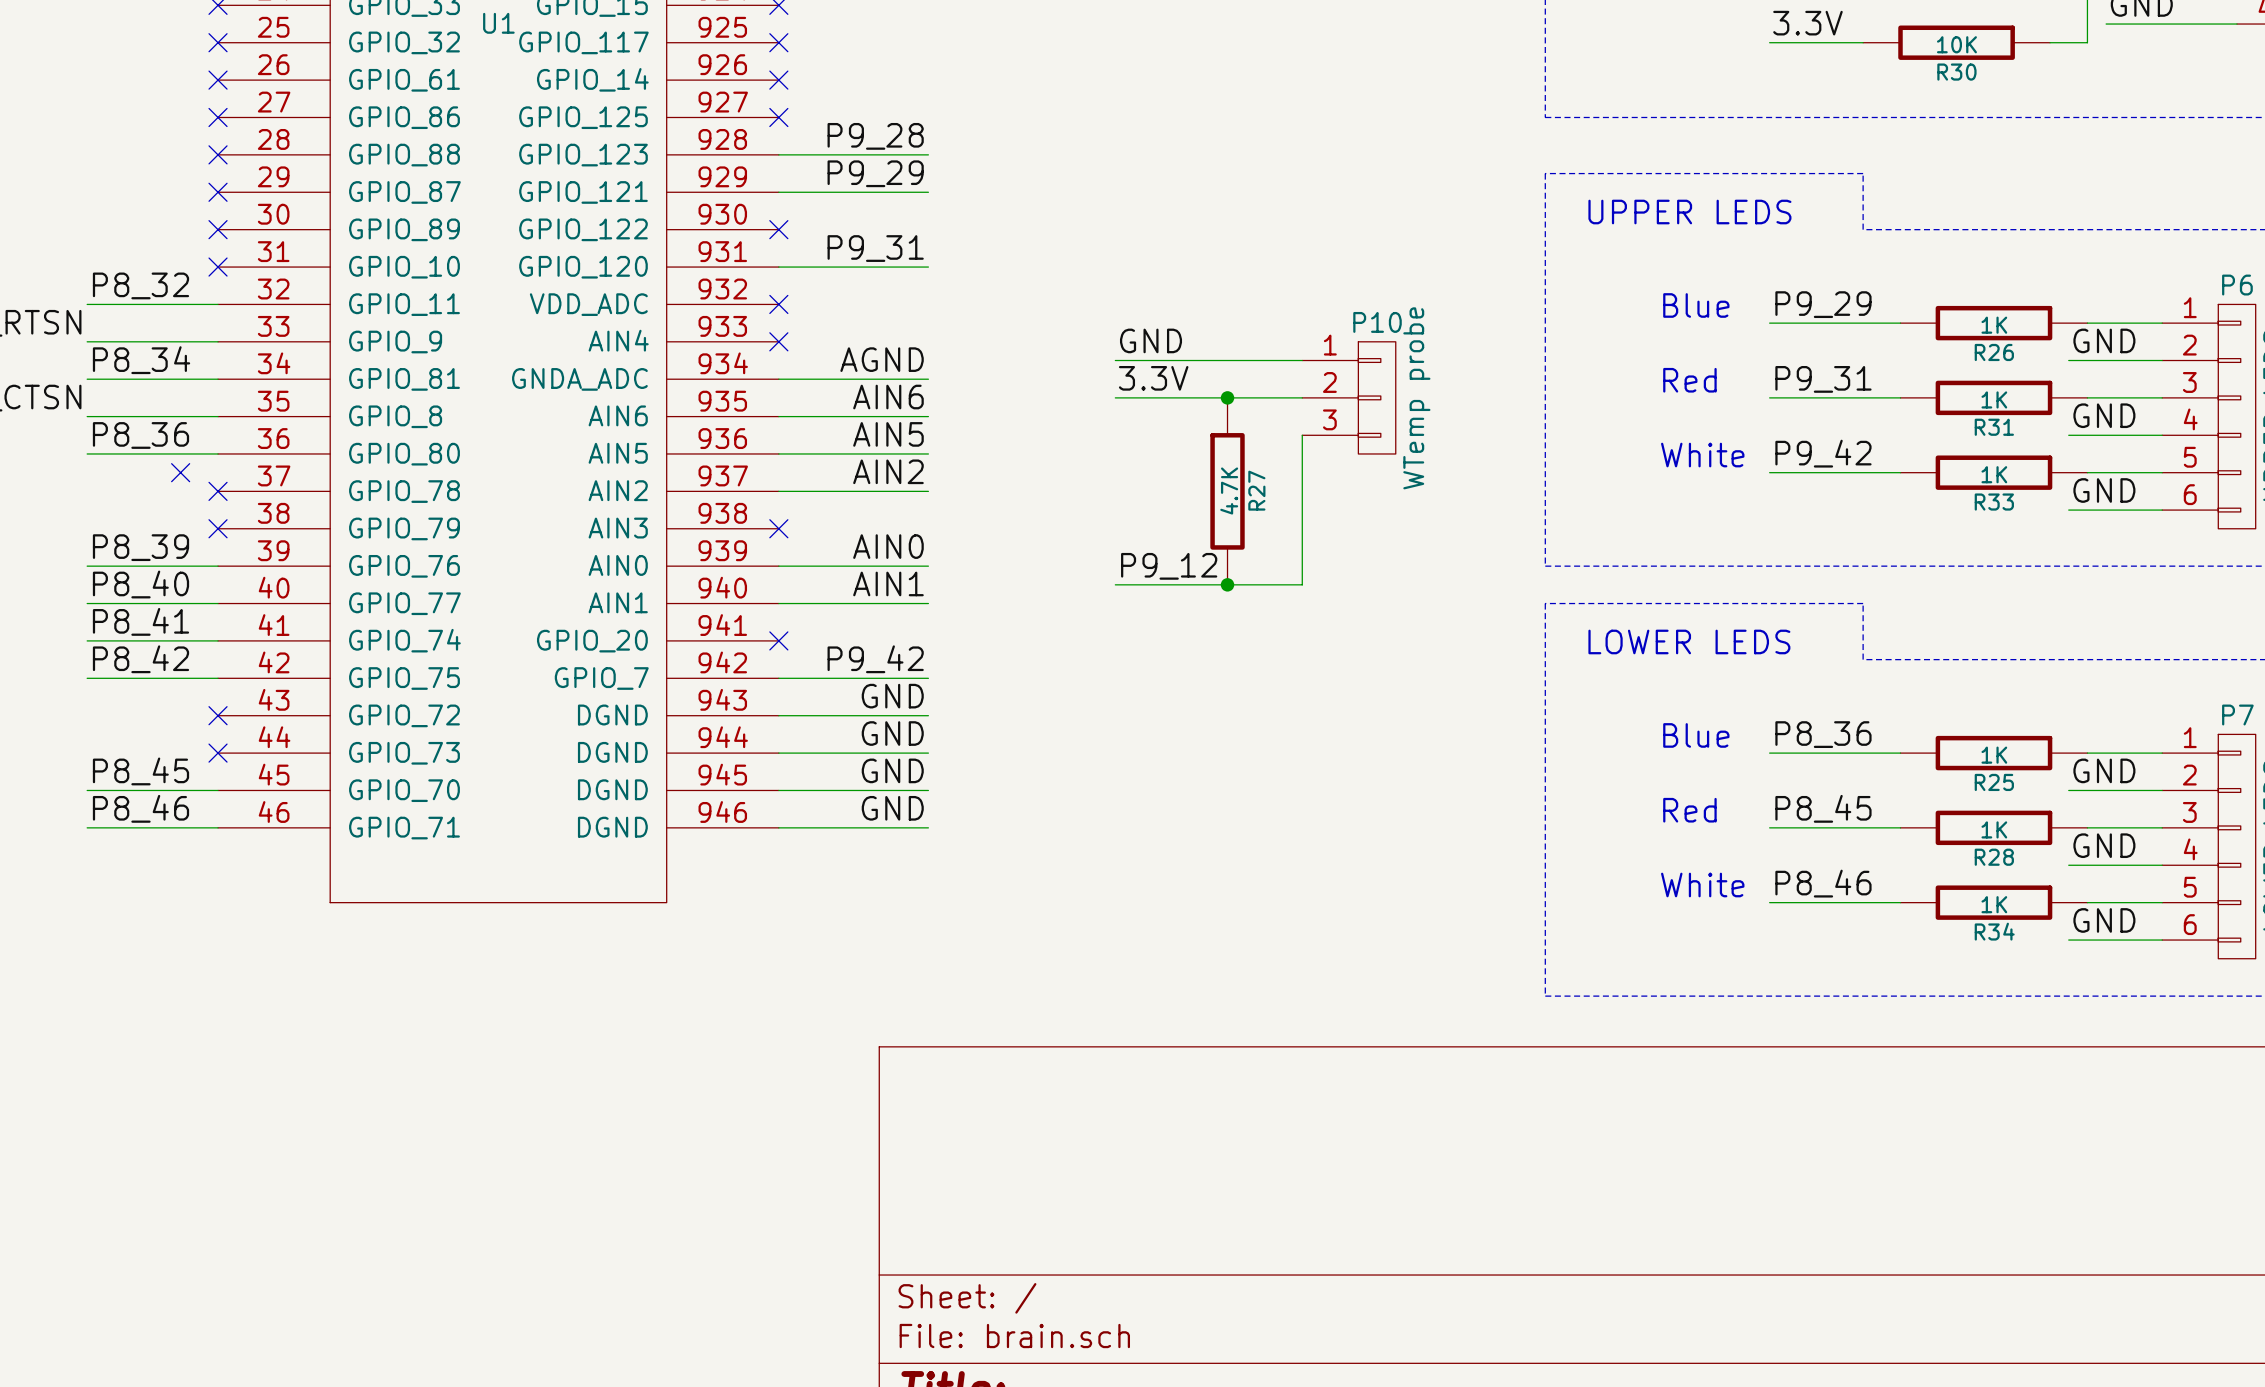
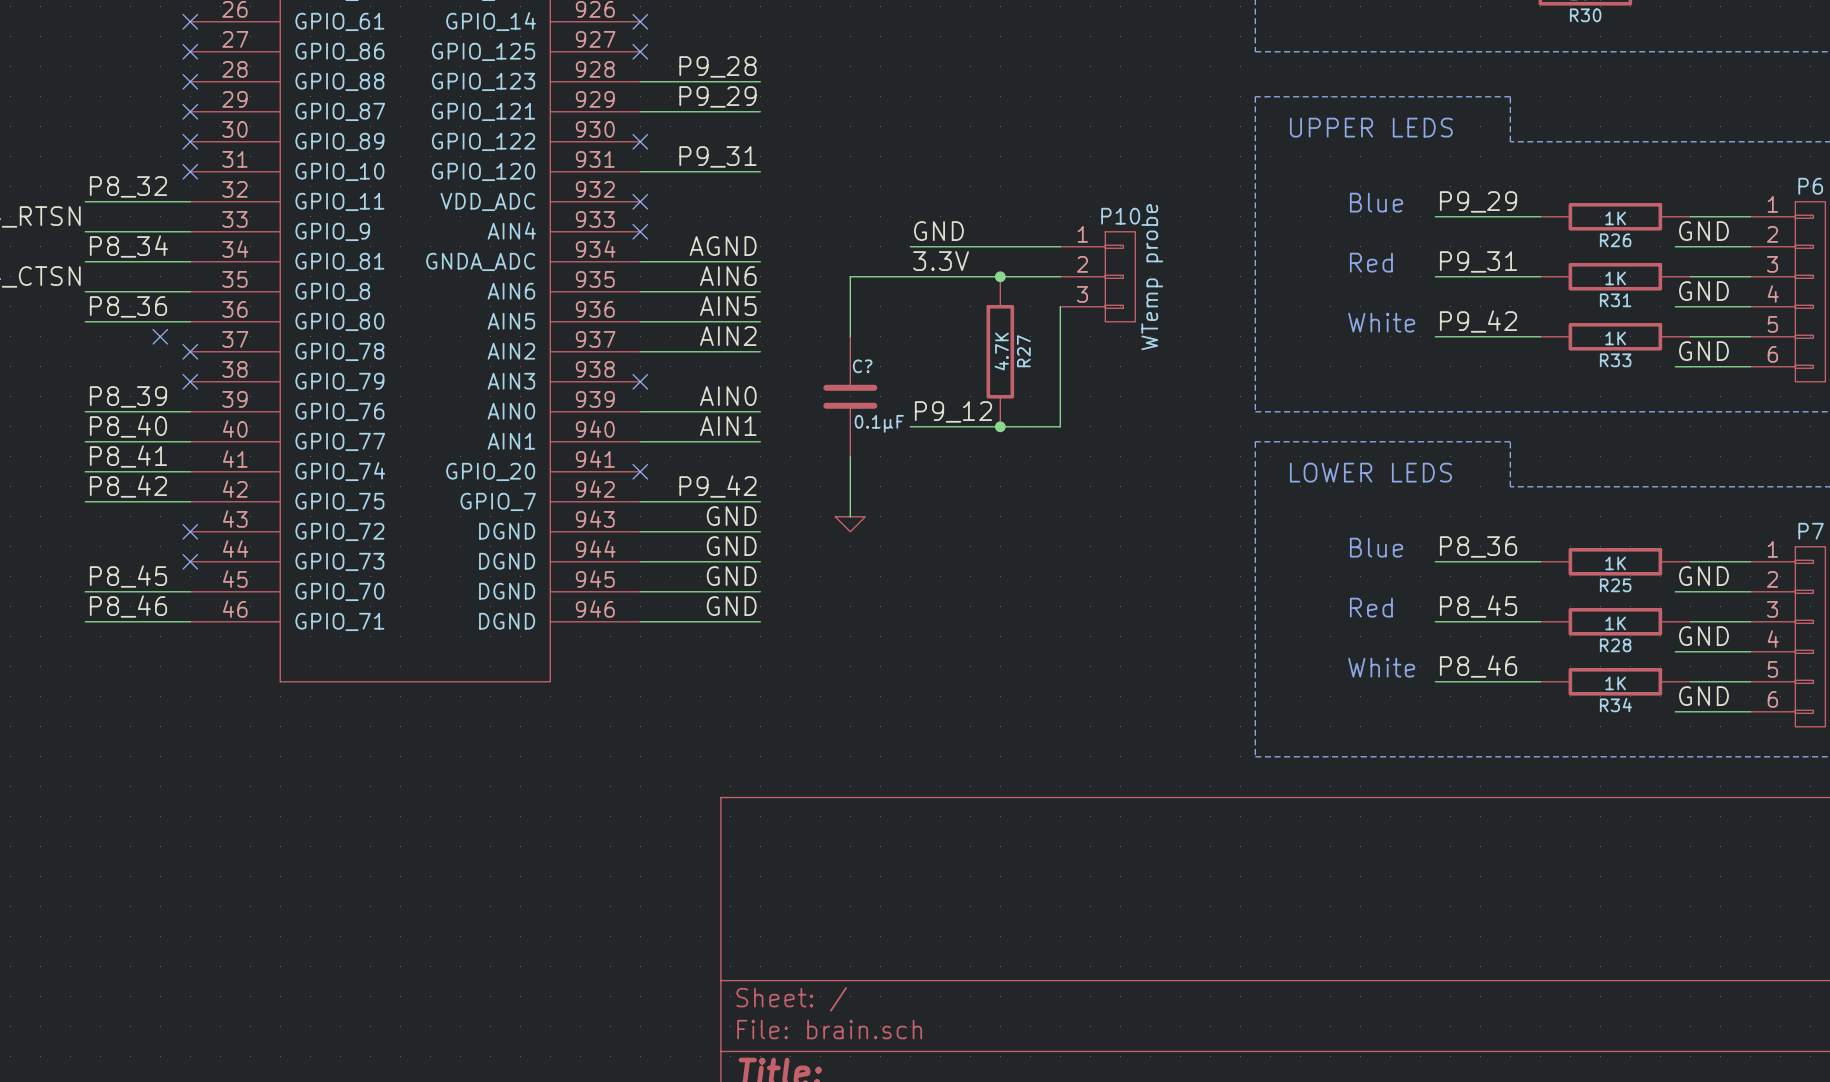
wire: none -> (910, 276) (850, 276) (850, 336)
C?: none -> 0.1µF (850, 396)
wire: none -> (850, 456) (850, 516)
power symbol: none -> (850, 524)

